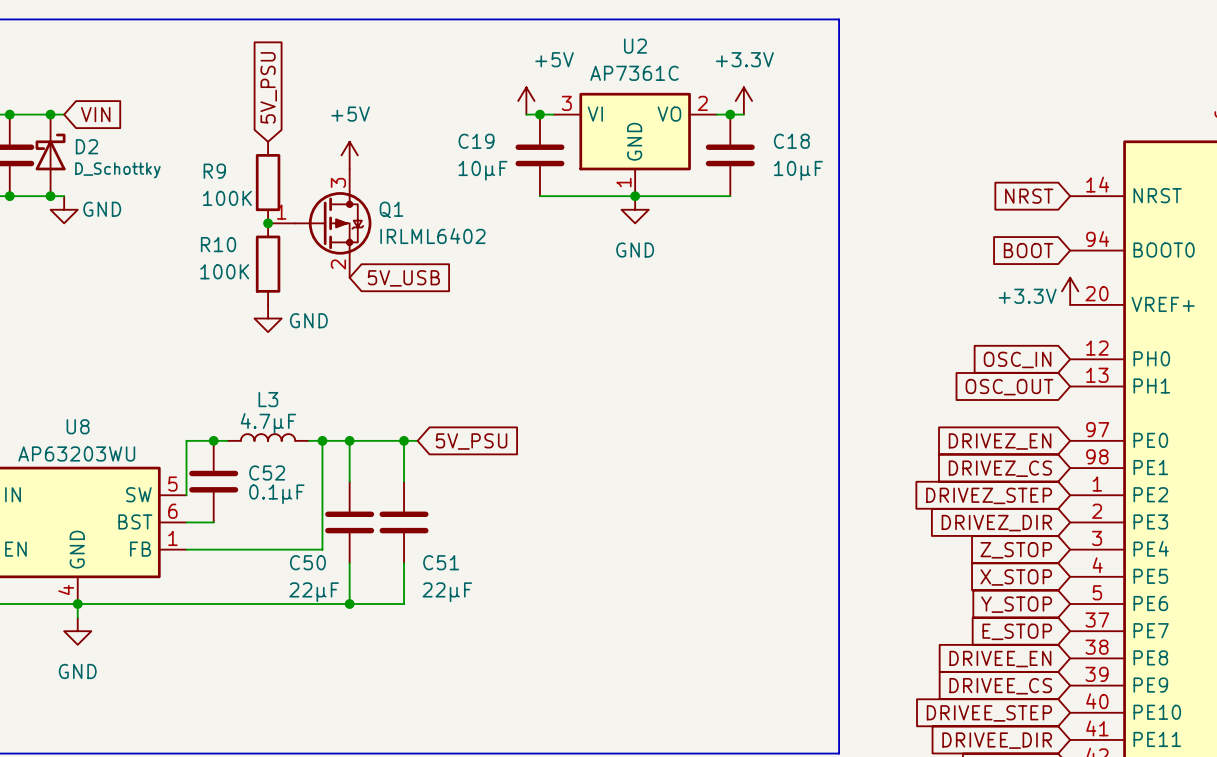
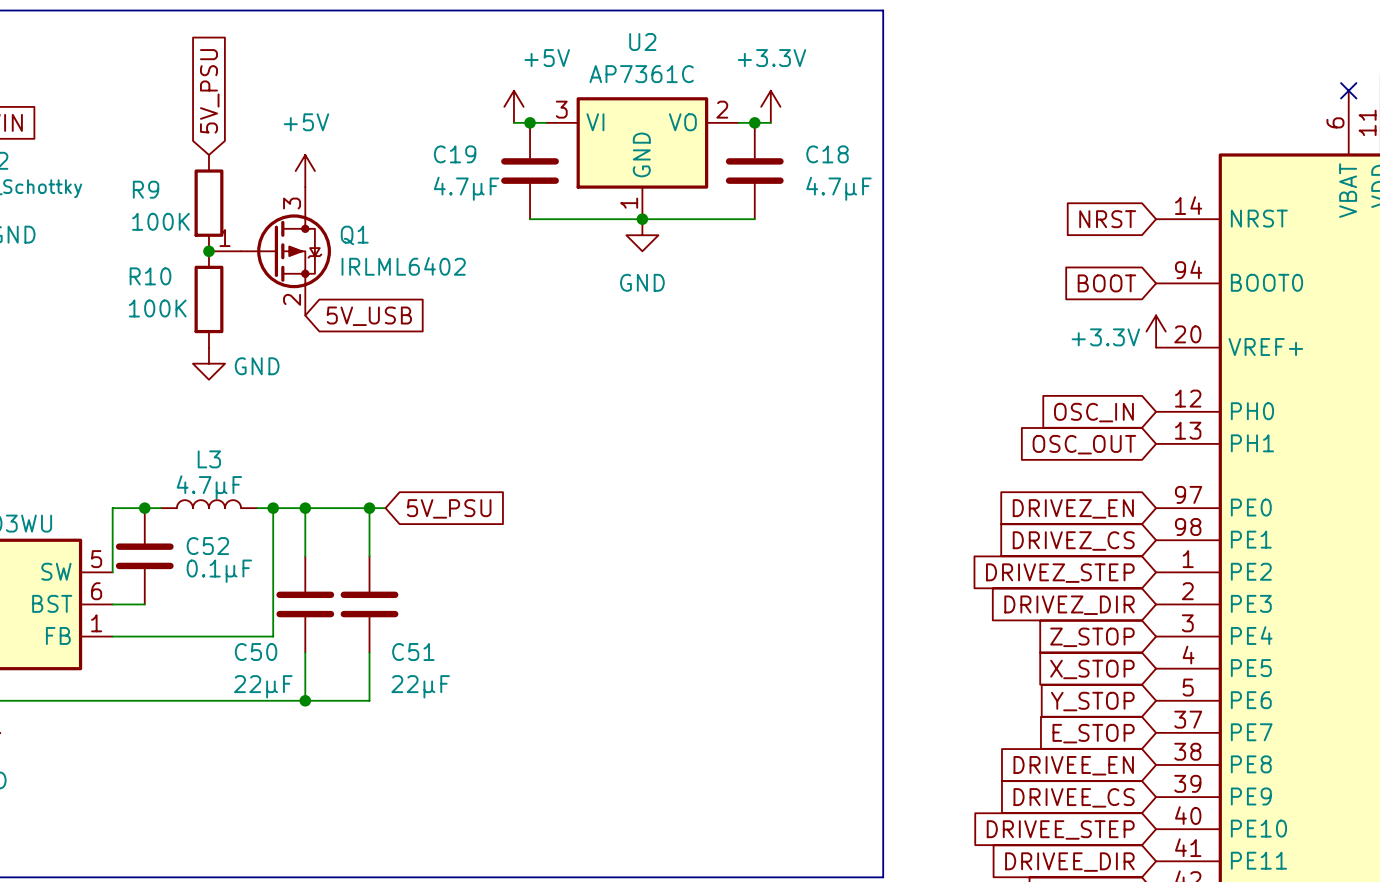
C19 value: 10µF (482, 170) -> 4.7µF (466, 188)
C18 value: 10µF (798, 170) -> 4.7µF (838, 188)

